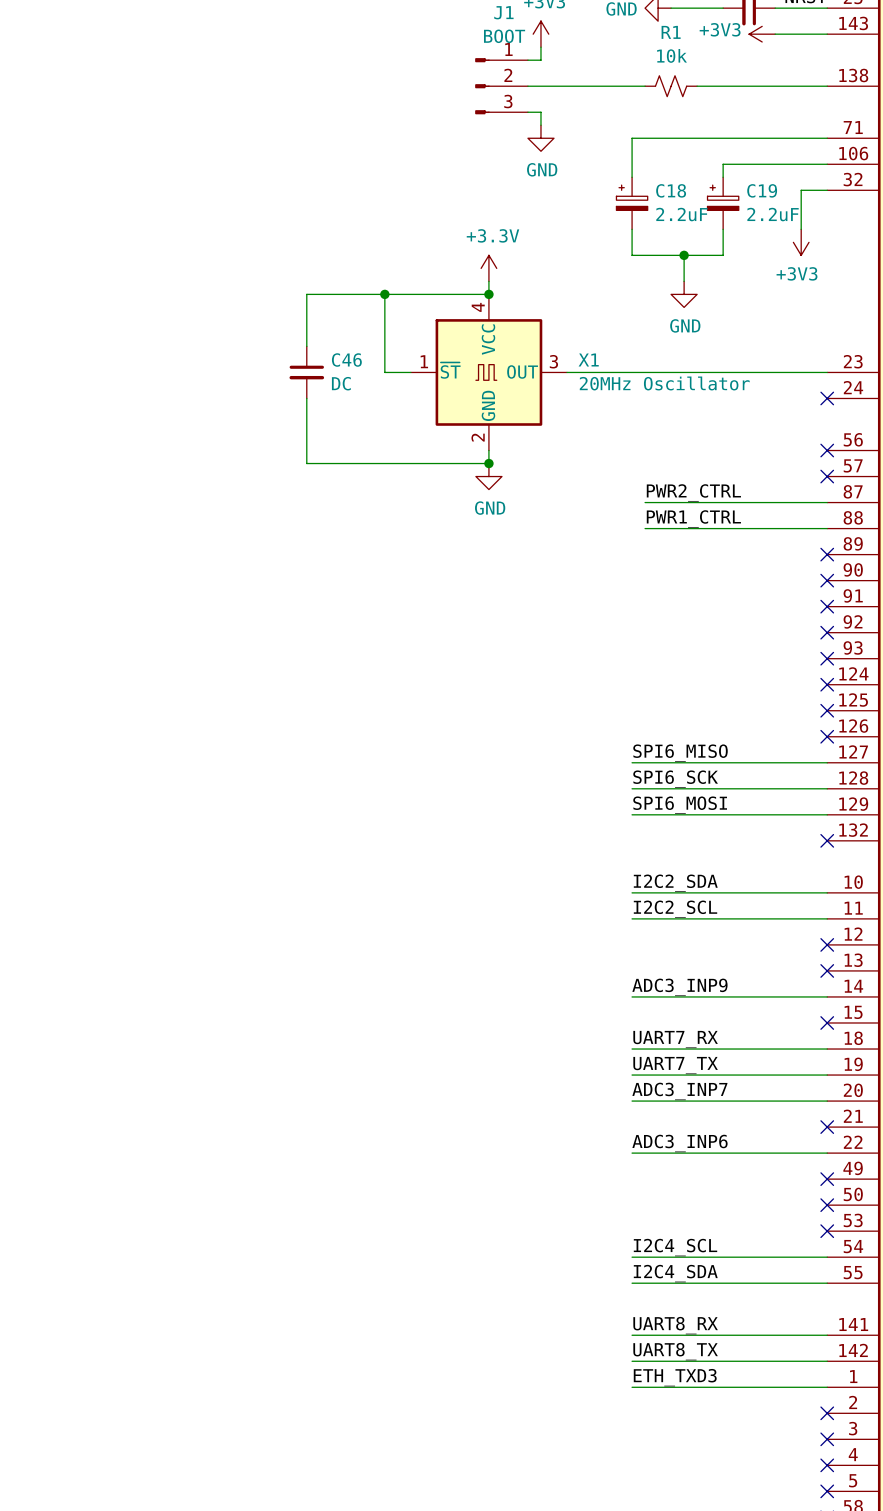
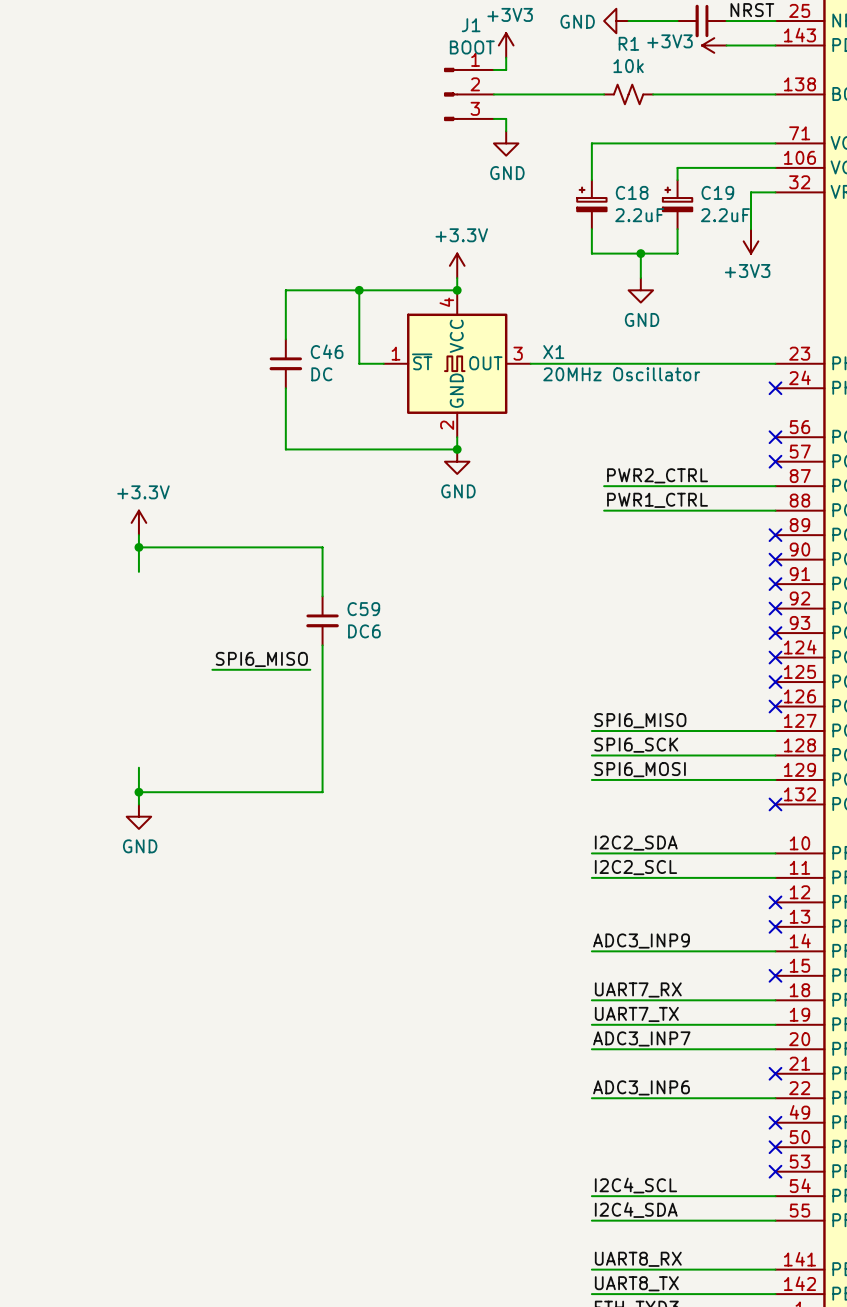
power symbol: none -> +3.3V (138, 522)
wire: none -> (138, 535) (138, 571)
wire: none -> (138, 547) (322, 547) (322, 596)
junction: none -> (138, 547)
C59: none -> DC6 (322, 620)
wire: none -> (322, 645) (322, 792) (138, 792)
label: none -> SPI6_MISO (261, 659)
wire: none -> (212, 669) (310, 669)
wire: none -> (138, 767) (138, 804)
junction: none -> (138, 792)
power symbol: none -> GND (138, 816)

